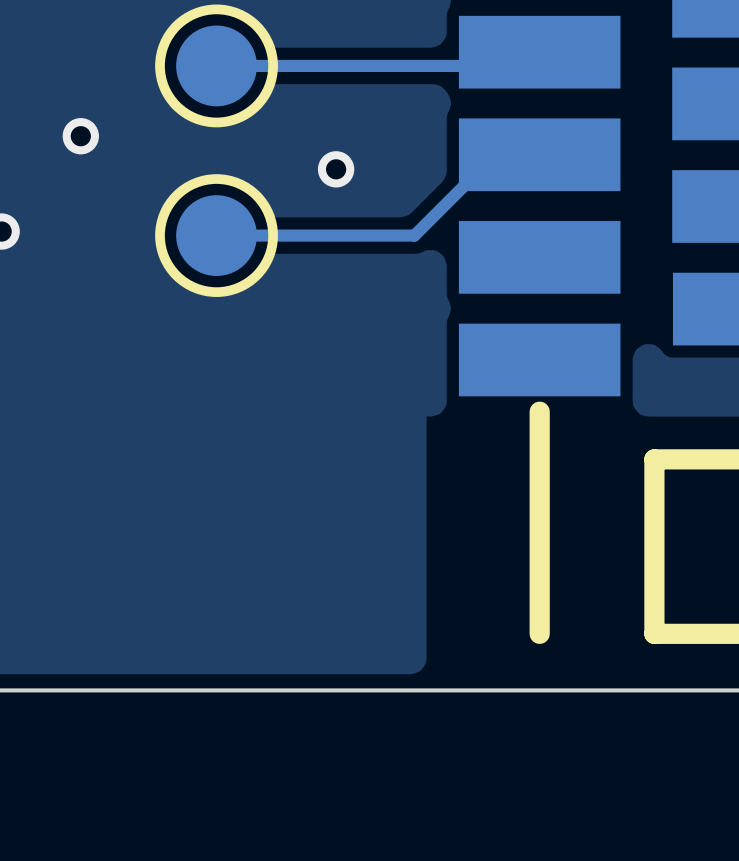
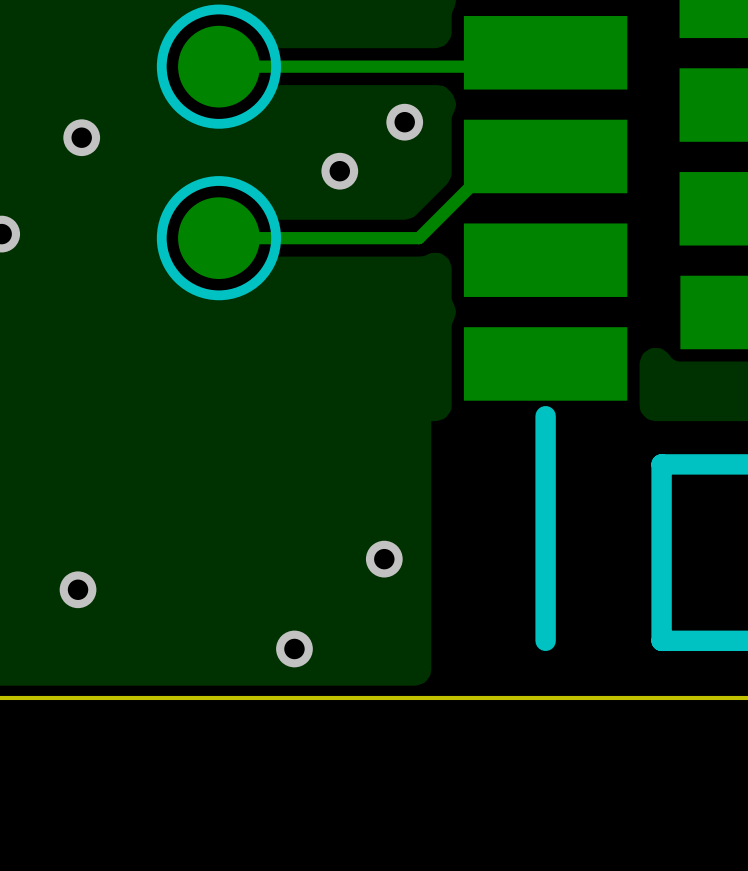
via: none -> (404, 122)
via: none -> (384, 559)
via: none -> (78, 589)
via: none -> (294, 648)

